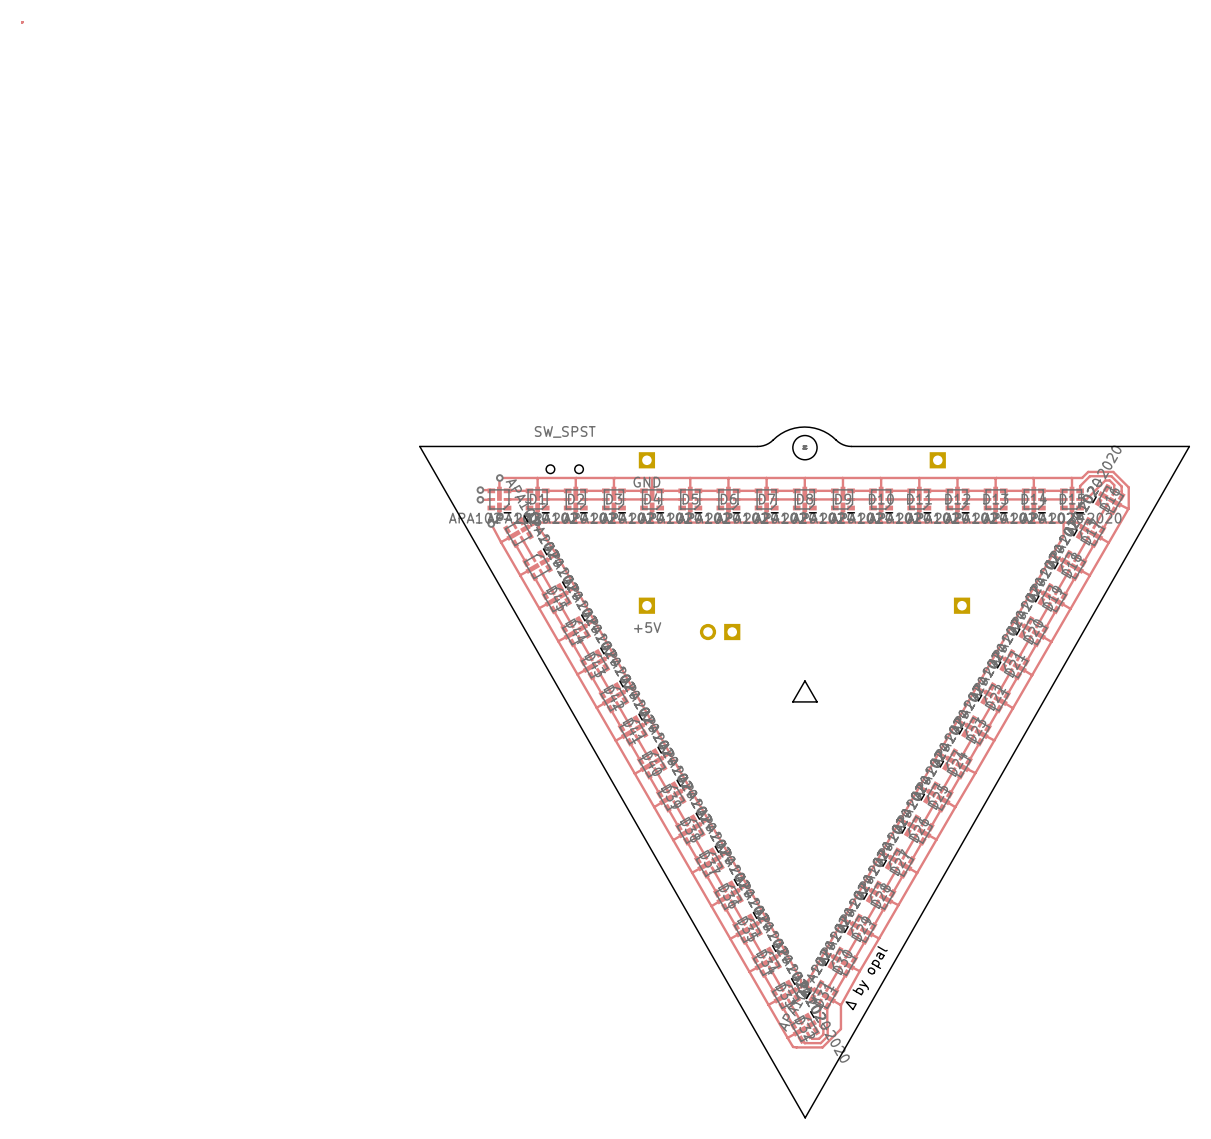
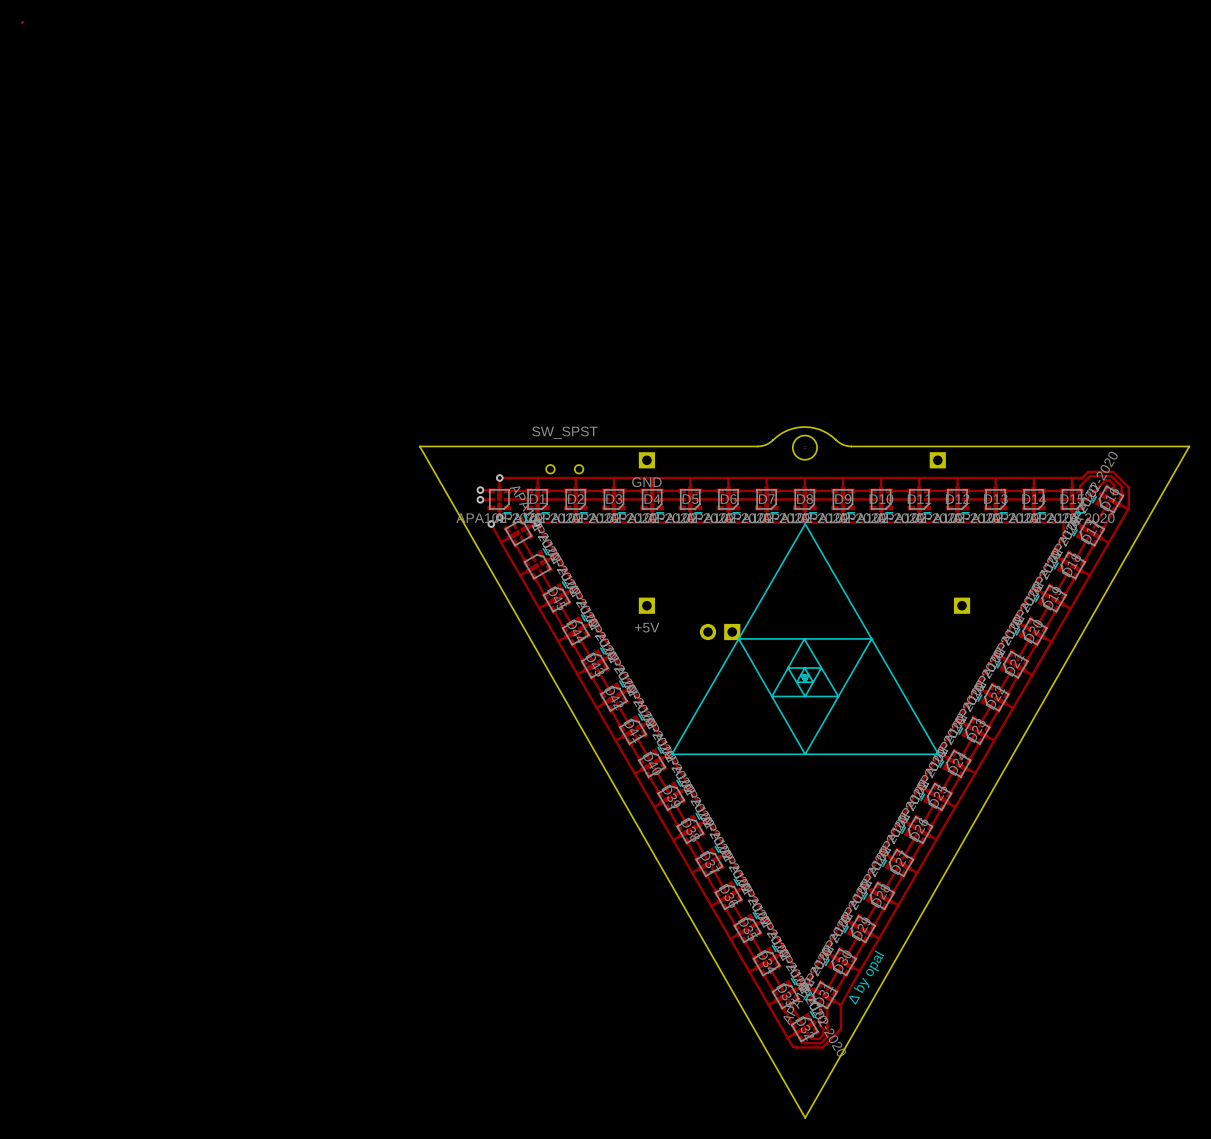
line: none -> (805, 524) (671, 754) (938, 754) (805, 524)
line: none -> (738, 638) (871, 638) (805, 754) (738, 638)
line: none -> (804, 639) (771, 696) (838, 696) (804, 639)
line: none -> (788, 668) (821, 668) (805, 696) (788, 668)
line: none -> (804, 668) (813, 682) (796, 682) (804, 668)
line: none -> (800, 675) (808, 675) (805, 682) (800, 675)
line: none -> (804, 675) (802, 678) (807, 678) (804, 675)
line: (804, 680) (817, 701) (792, 701) (804, 680) -> none

